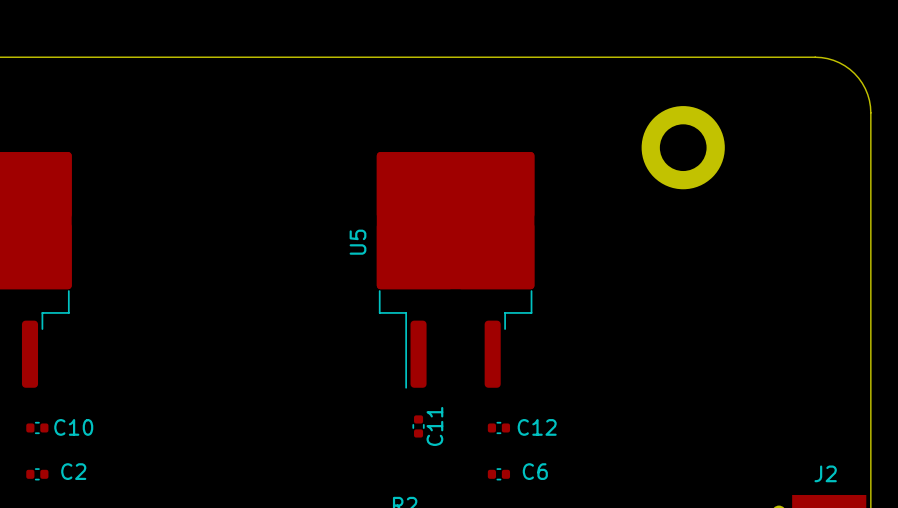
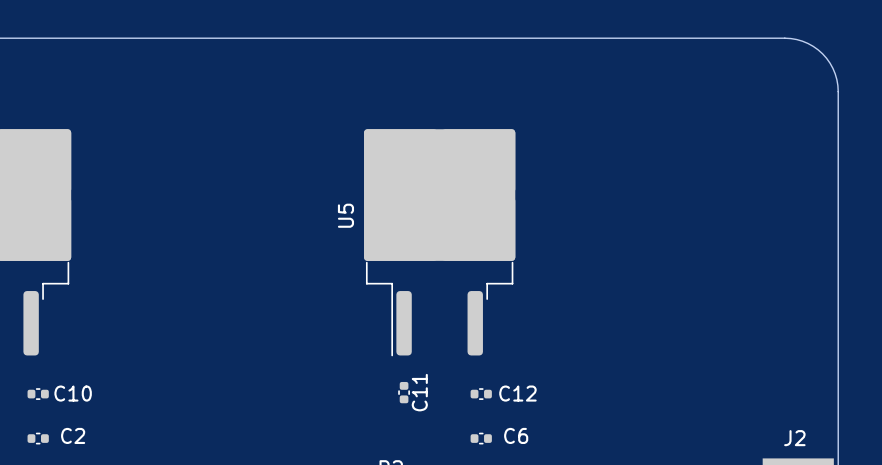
part: (683, 147) -> none

